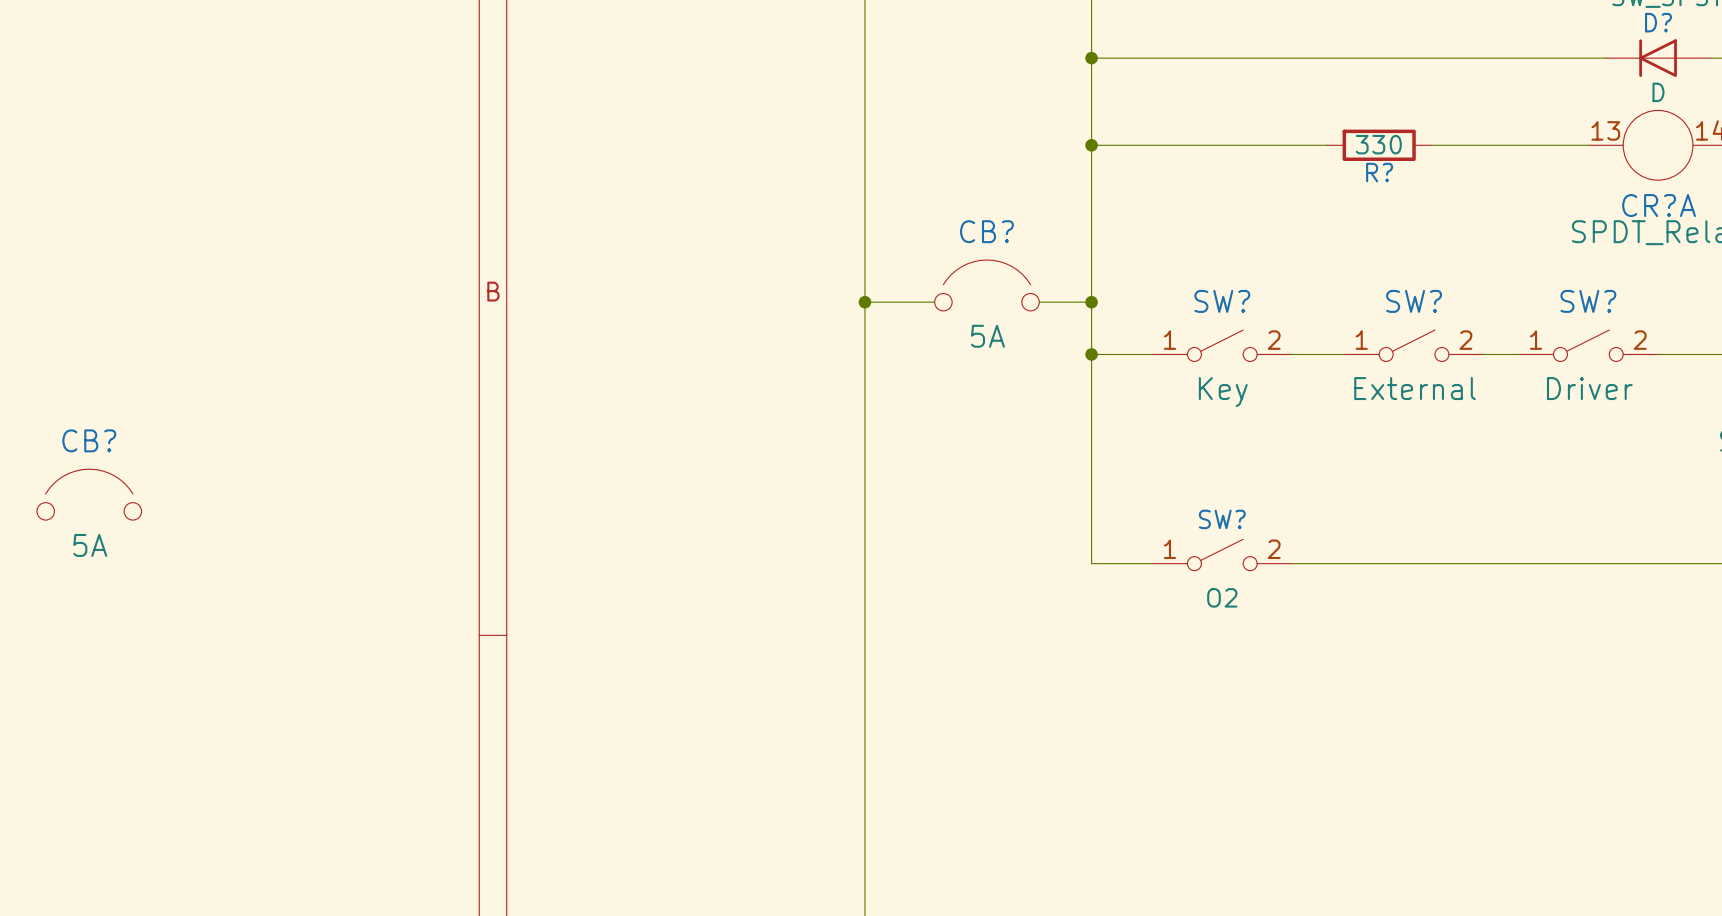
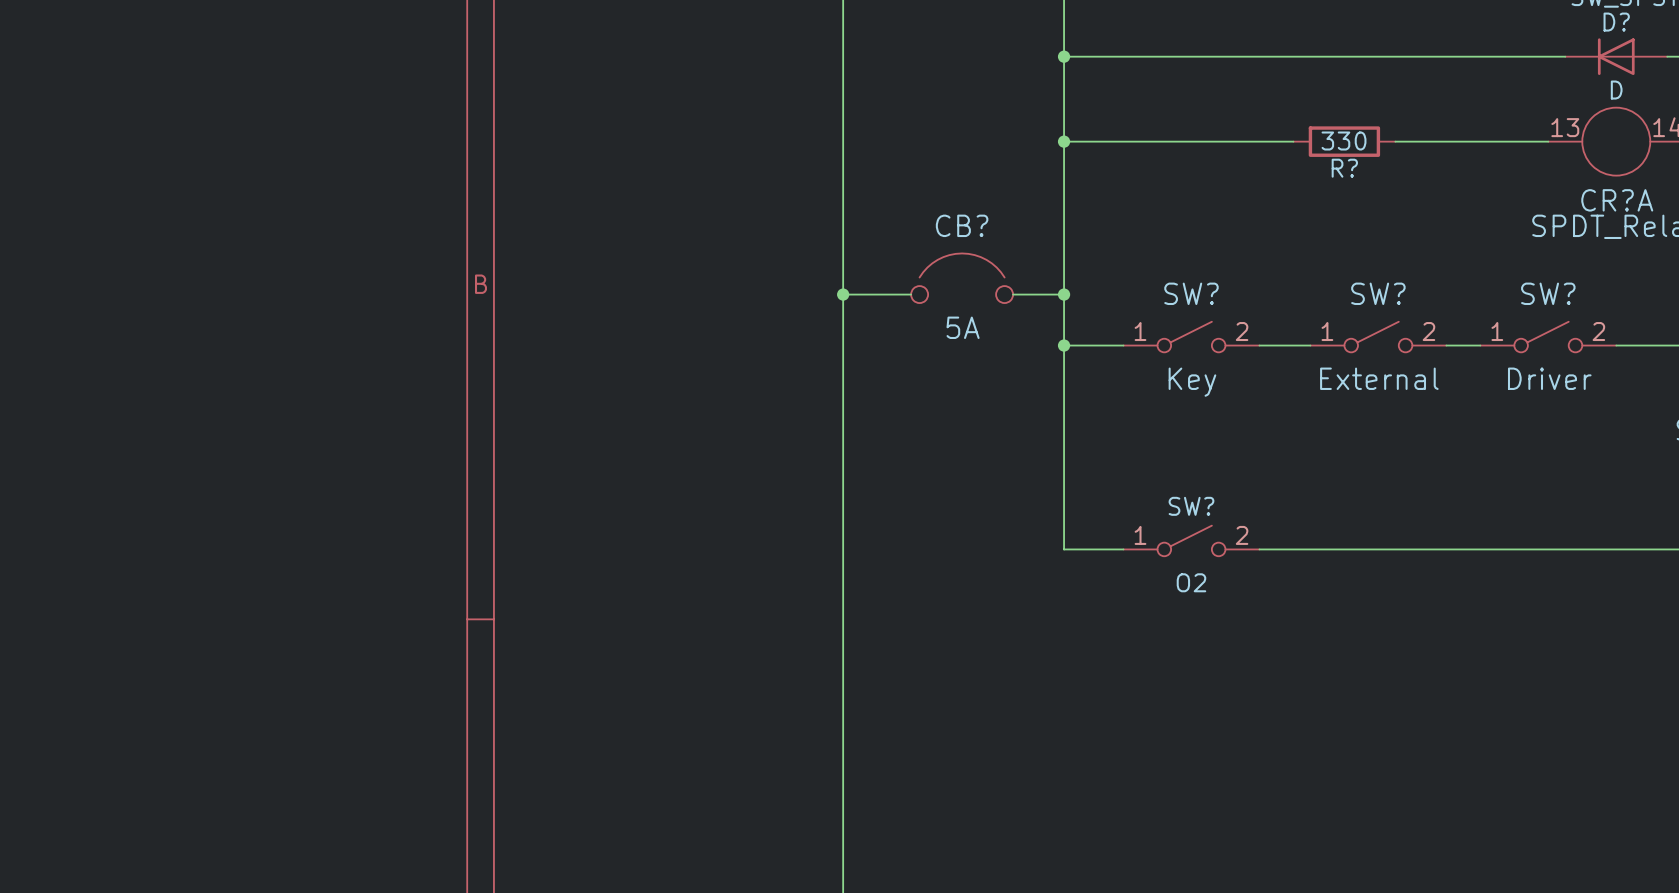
CB?: 5A (89, 494) -> none

